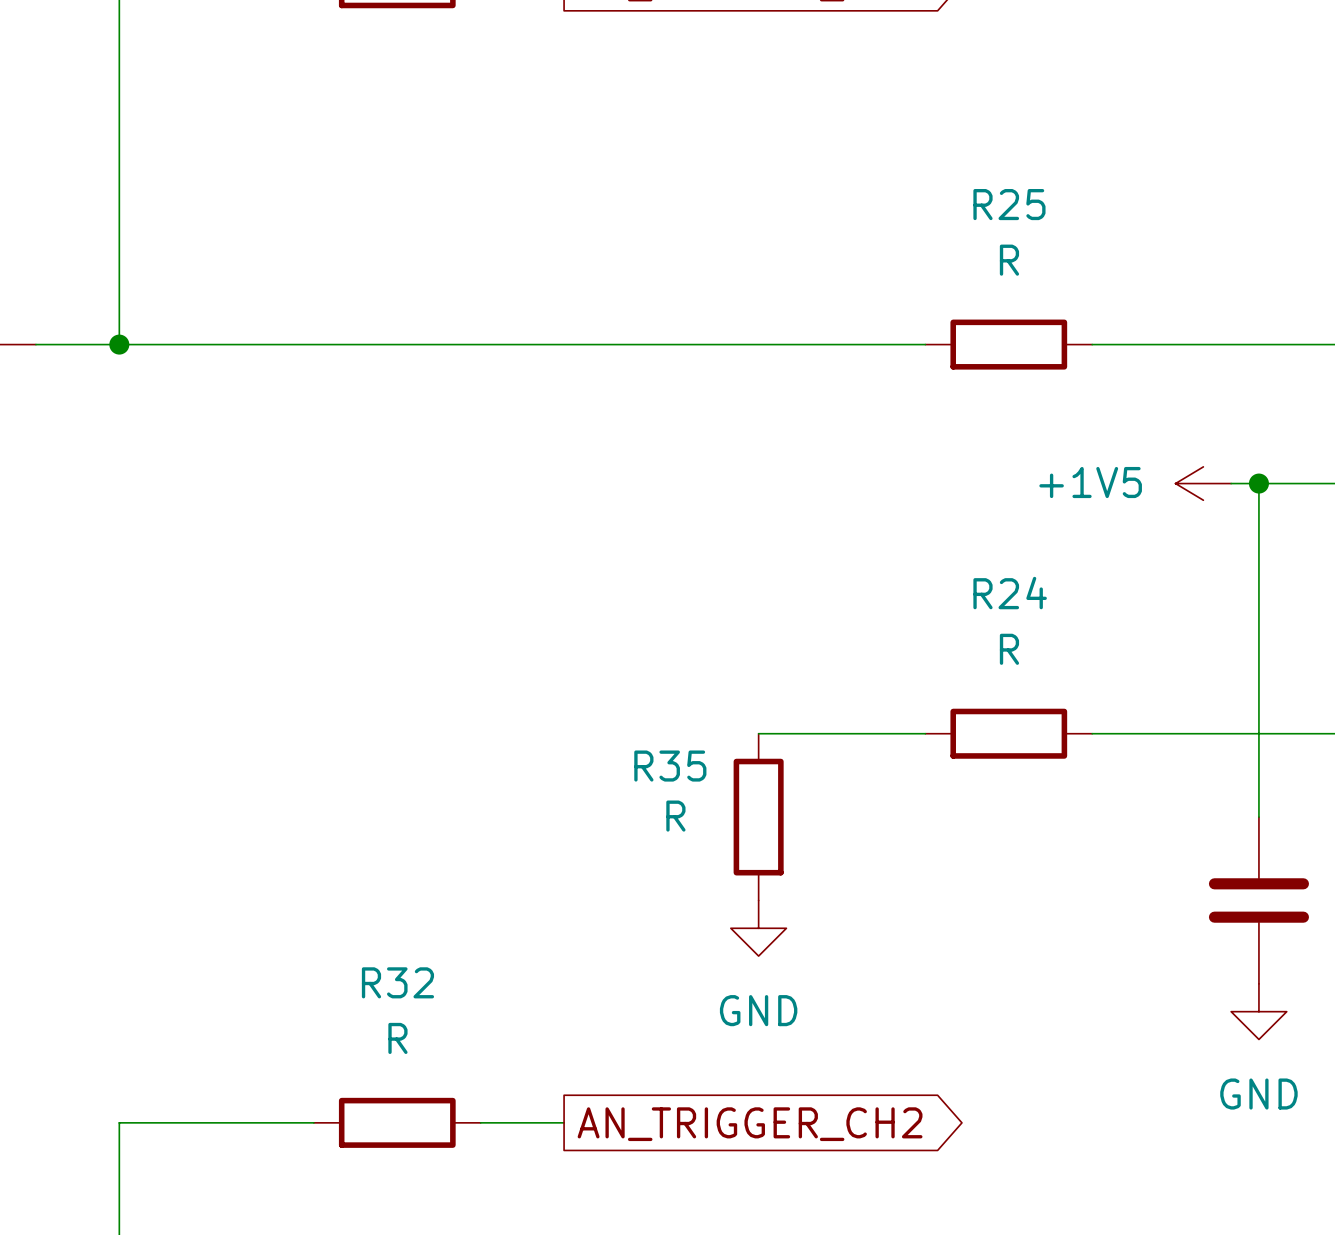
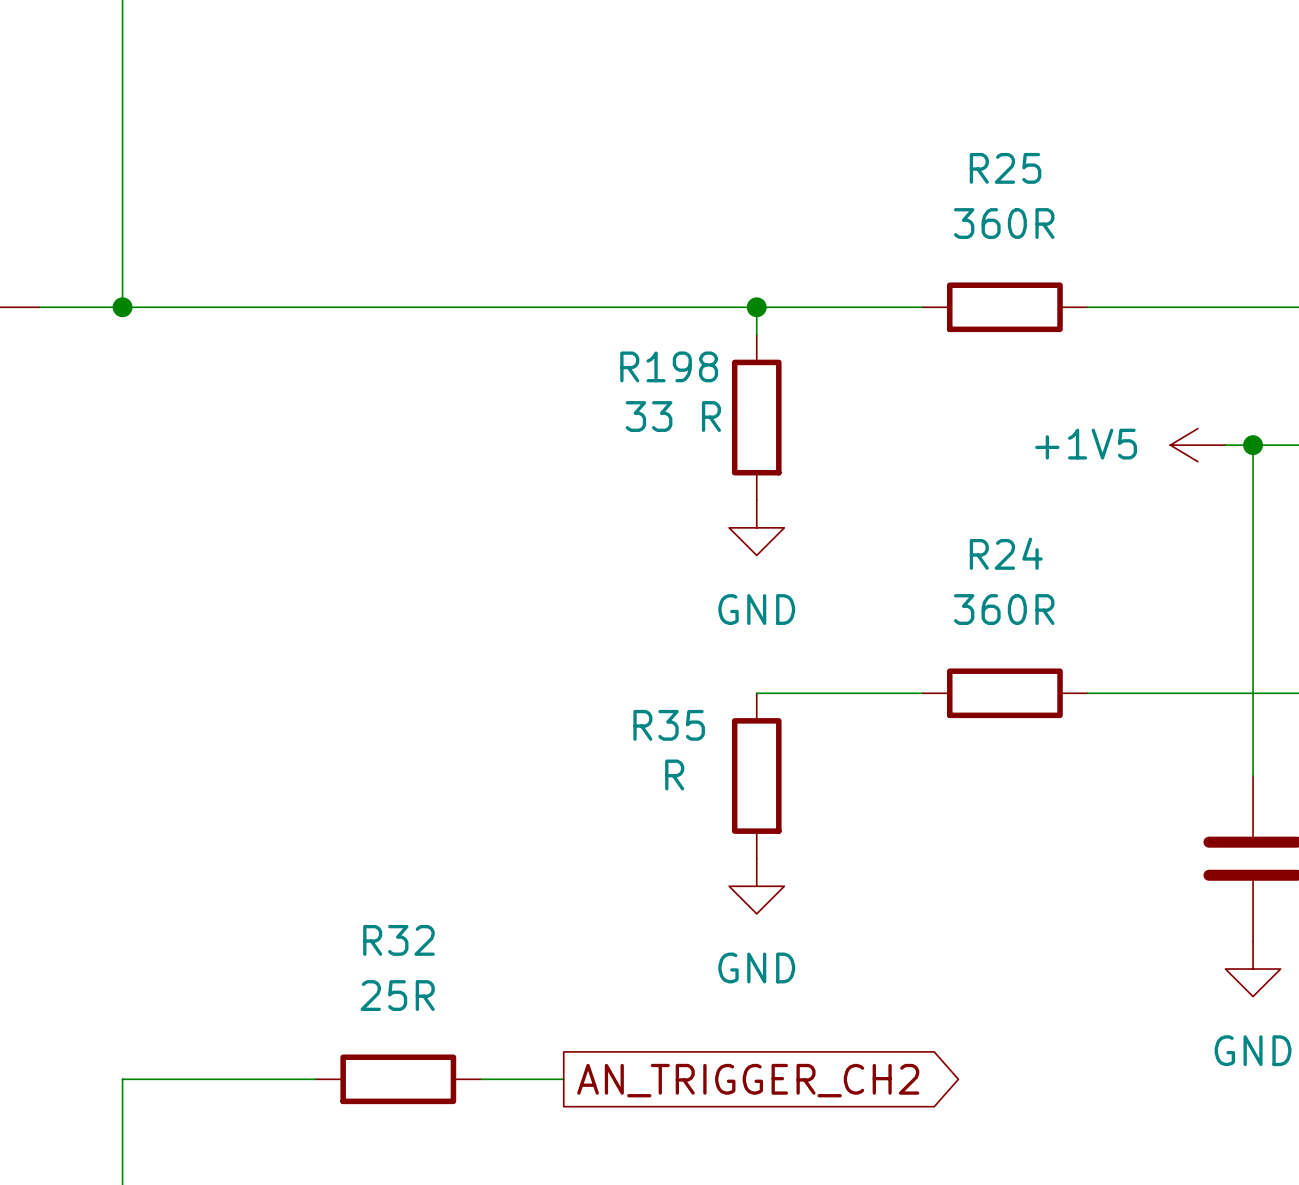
R25 value: R (1009, 260) -> 360R (1004, 223)
wire: none -> (756, 307) (756, 334)
junction: none -> (756, 307)
R198: none -> 33 R (756, 417)
power symbol: none -> GND (756, 527)
R24 value: R (1009, 649) -> 360R (1004, 609)
R32 value: R (397, 1038) -> 25R (397, 995)

